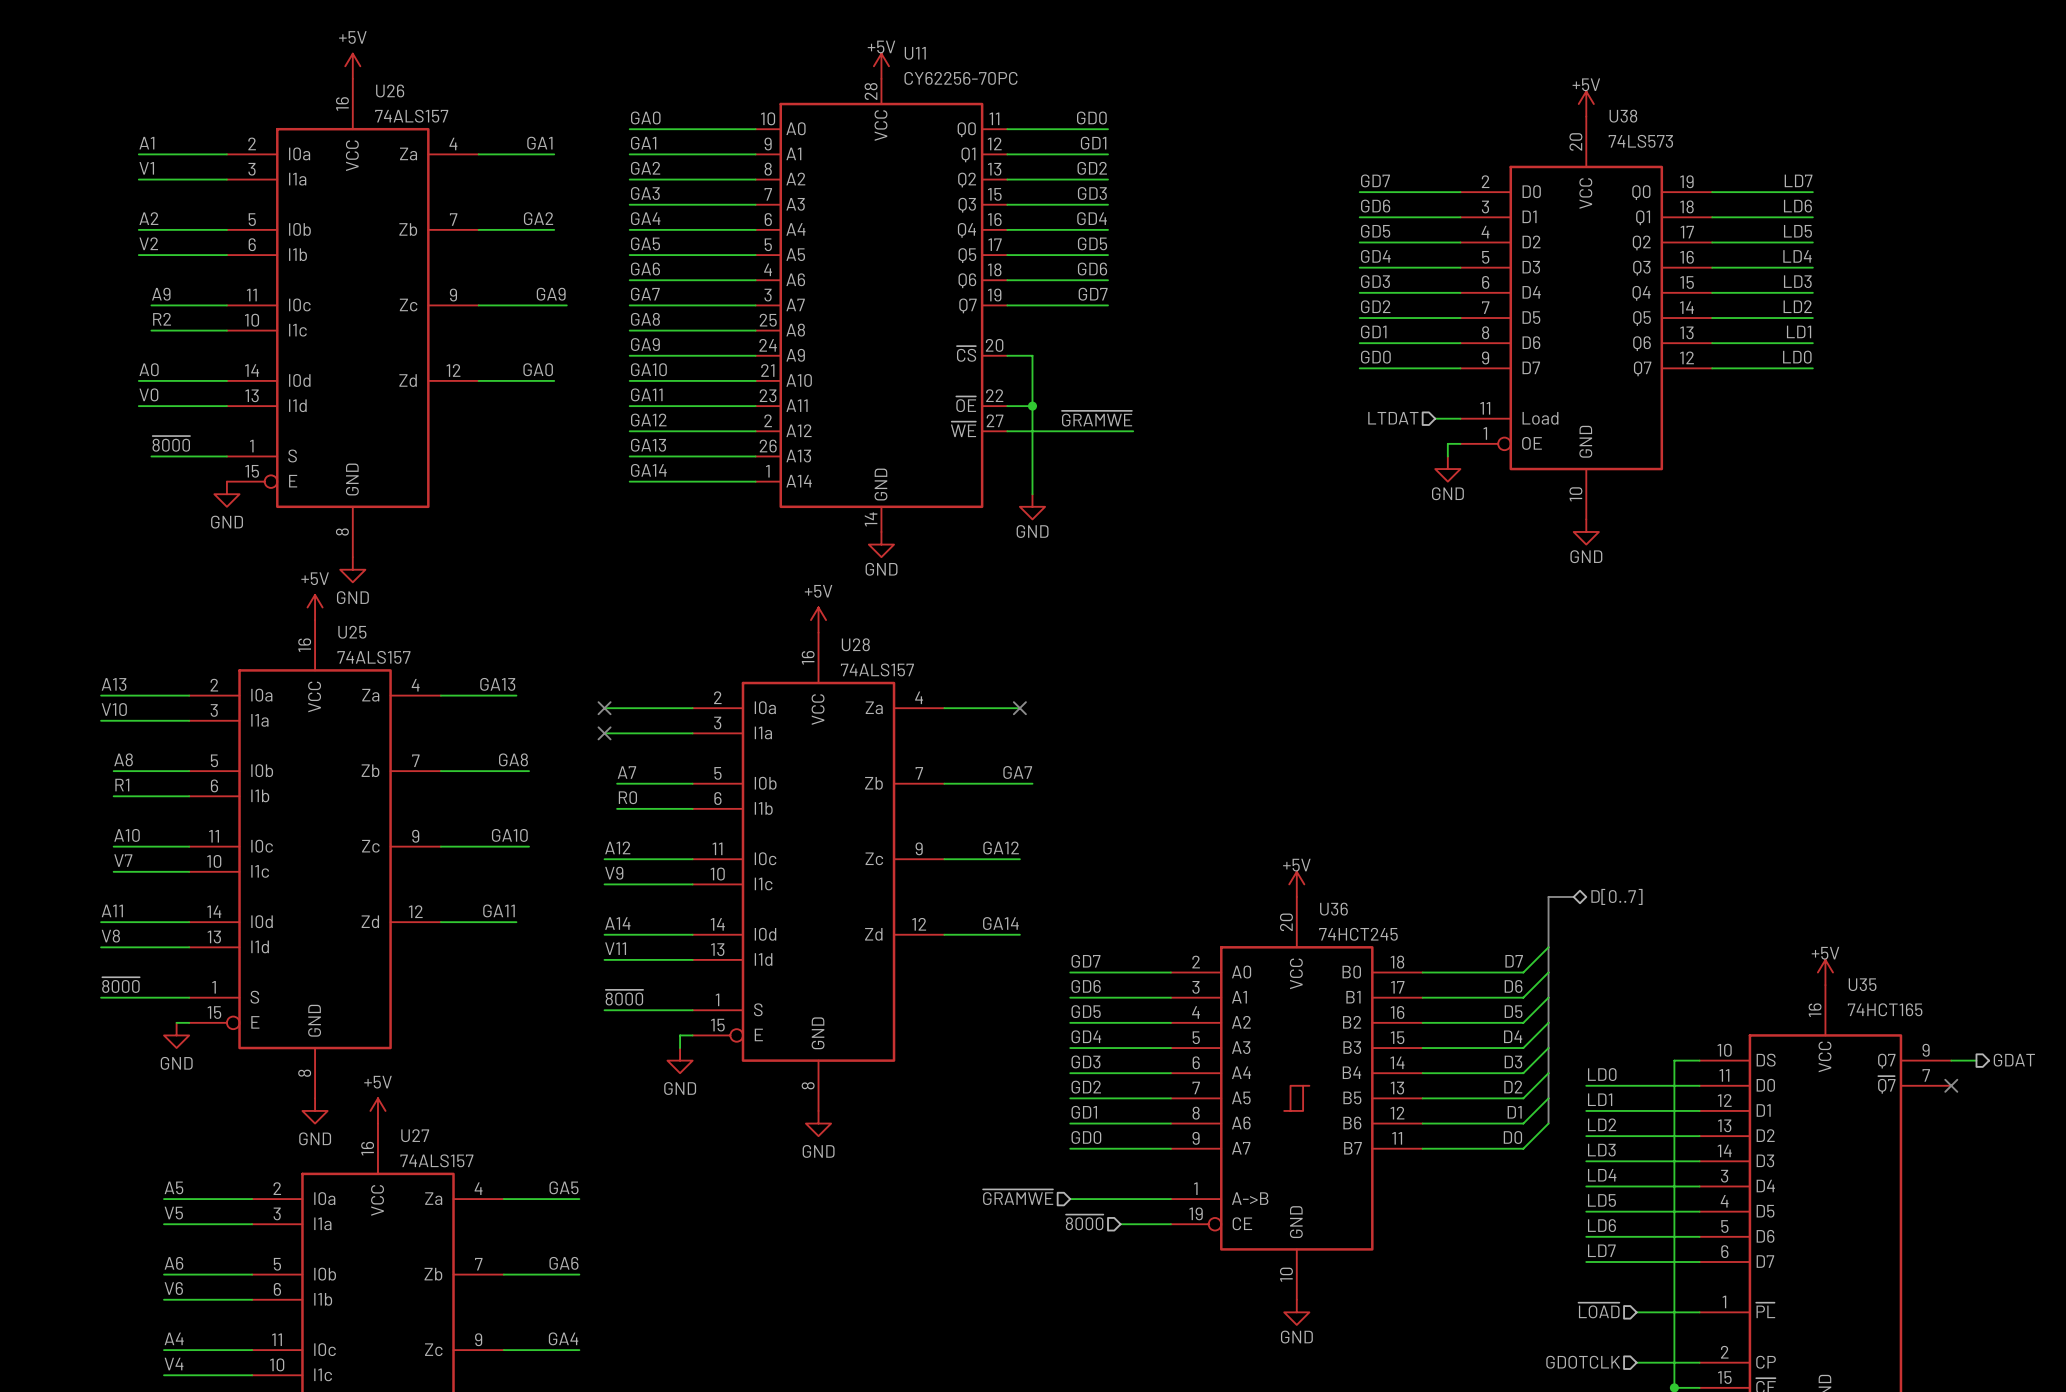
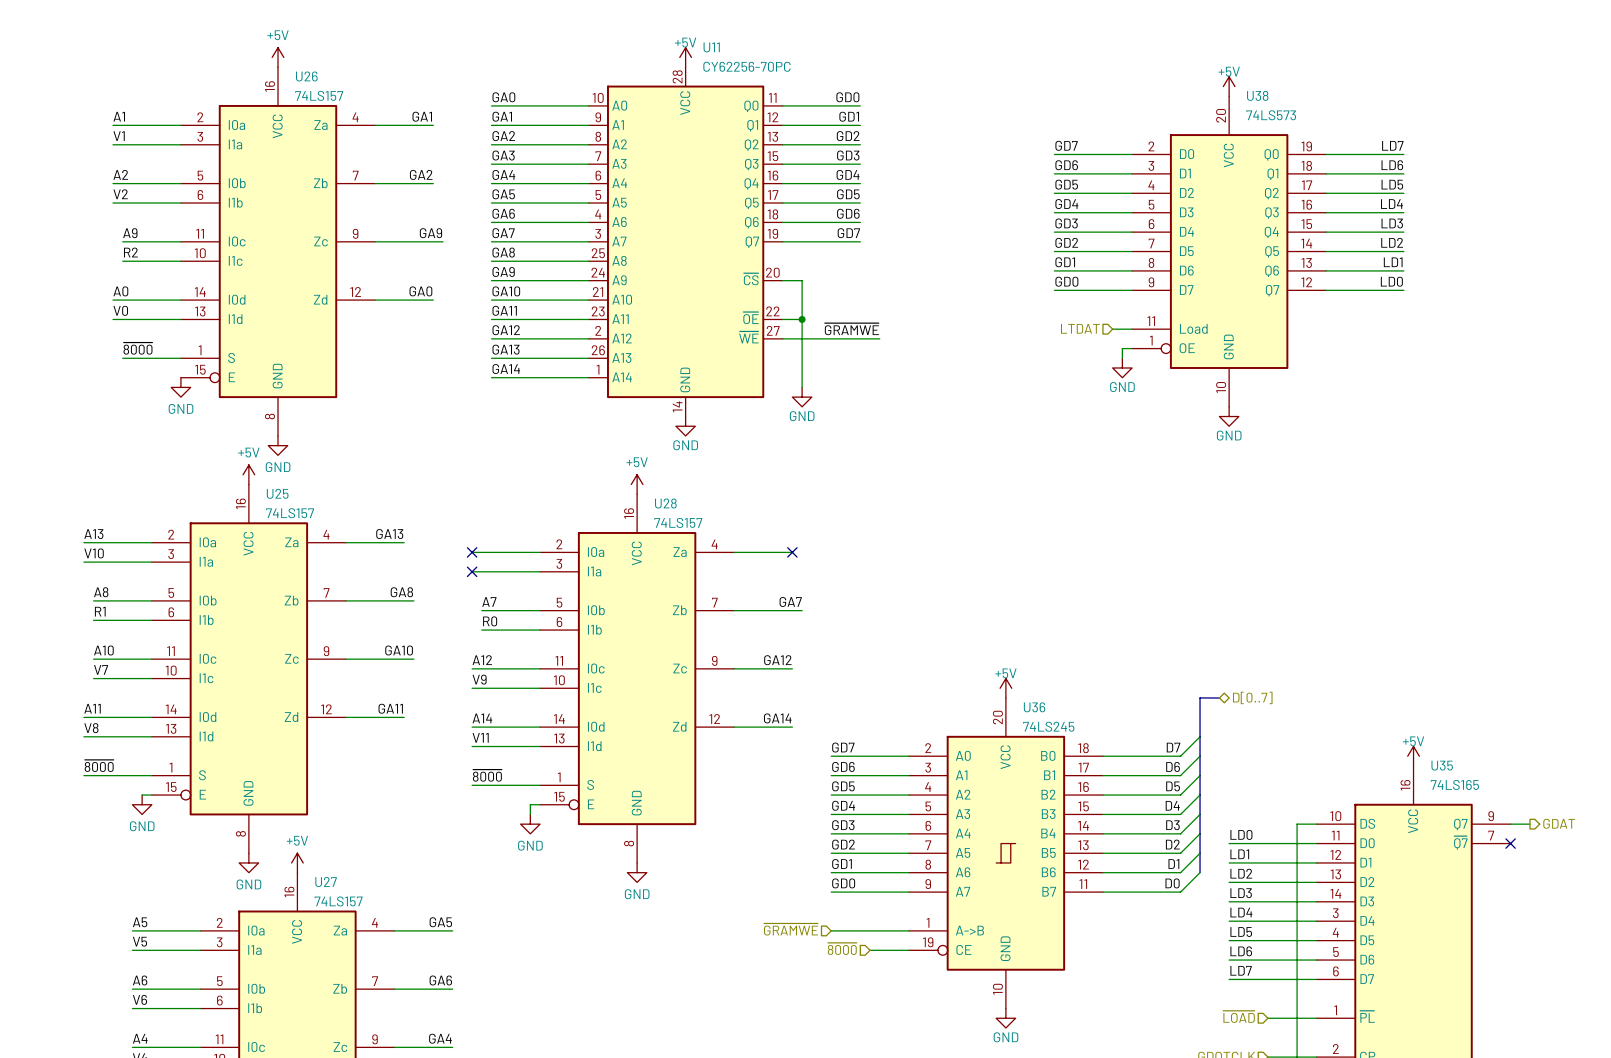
U26 value: 74ALS157 (411, 116) -> 74LS157 (319, 95)
U25 value: 74ALS157 (373, 657) -> 74LS157 (290, 513)
U28 value: 74ALS157 (877, 669) -> 74LS157 (678, 522)
U36 value: 74HCT245 (1358, 934) -> 74LS245 (1048, 726)
U35 value: 74HCT165 (1885, 1009) -> 74LS165 (1454, 784)
U27 value: 74ALS157 (436, 1160) -> 74LS157 (338, 901)

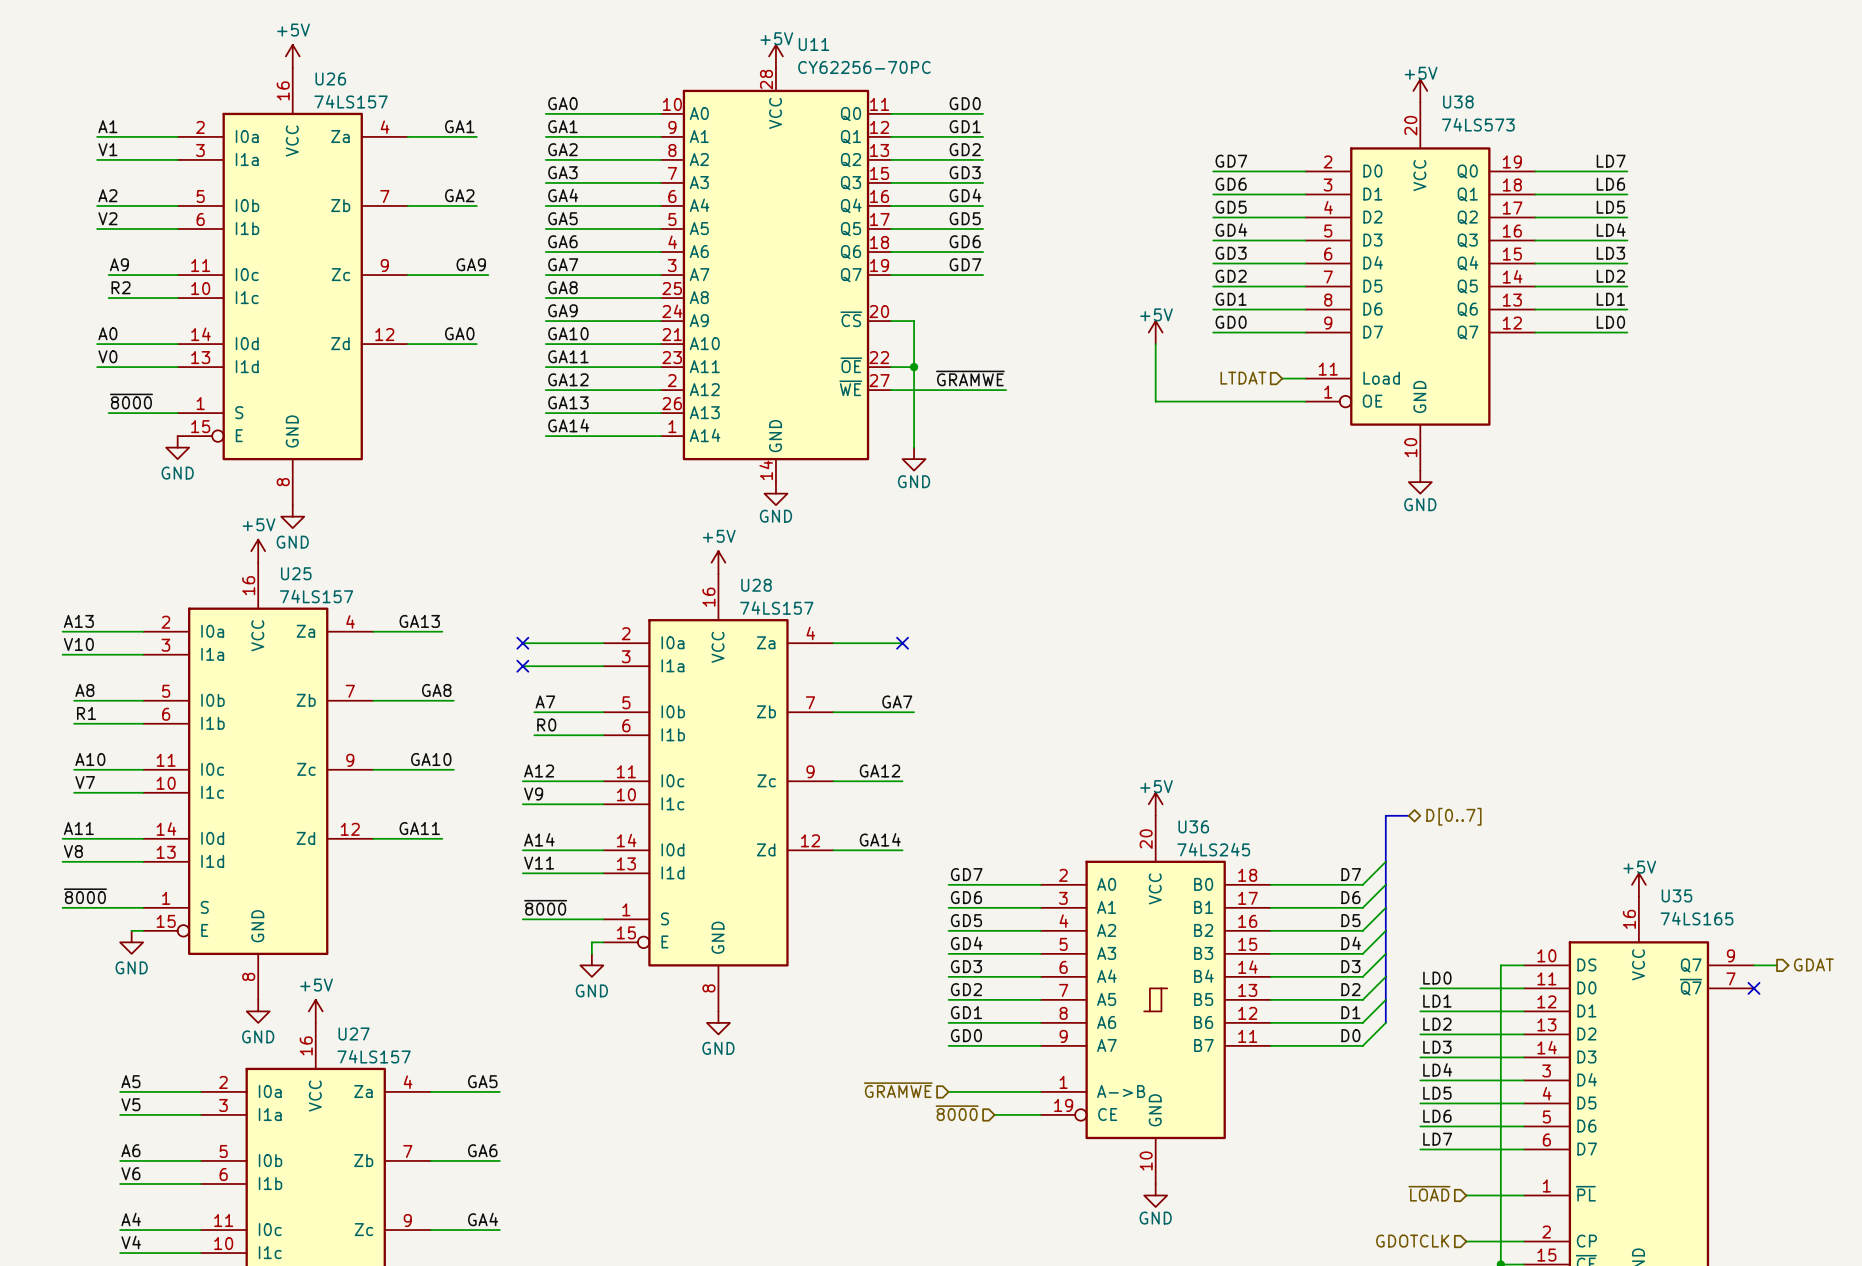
power symbol: none -> +5V (1155, 332)
wire: (1122, 348) (1122, 358) -> (1293, 401) (1155, 401) (1155, 344)
power symbol: GND (1122, 368) -> none

